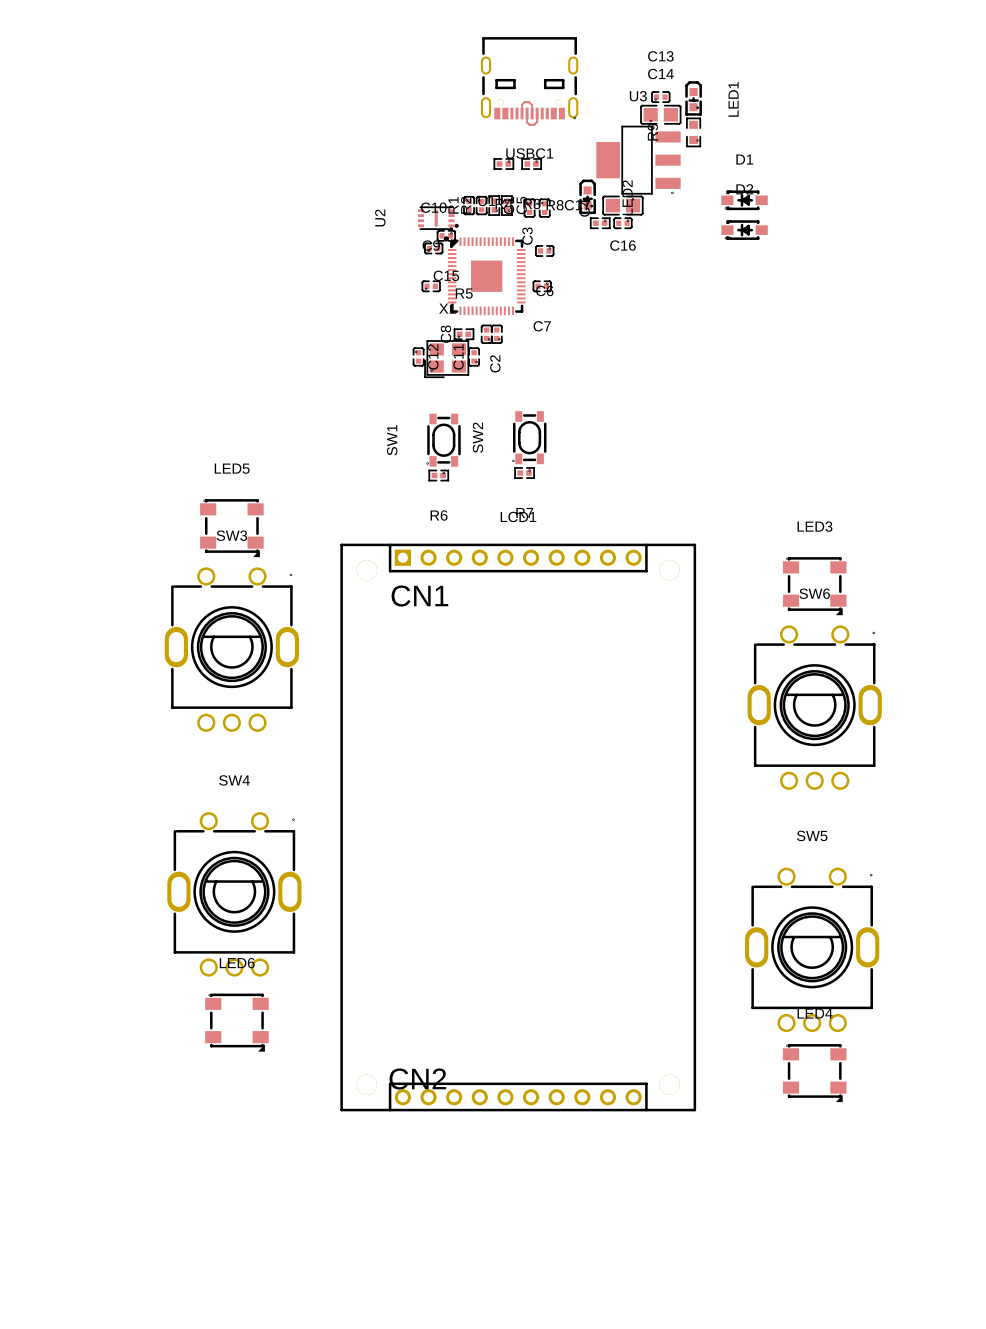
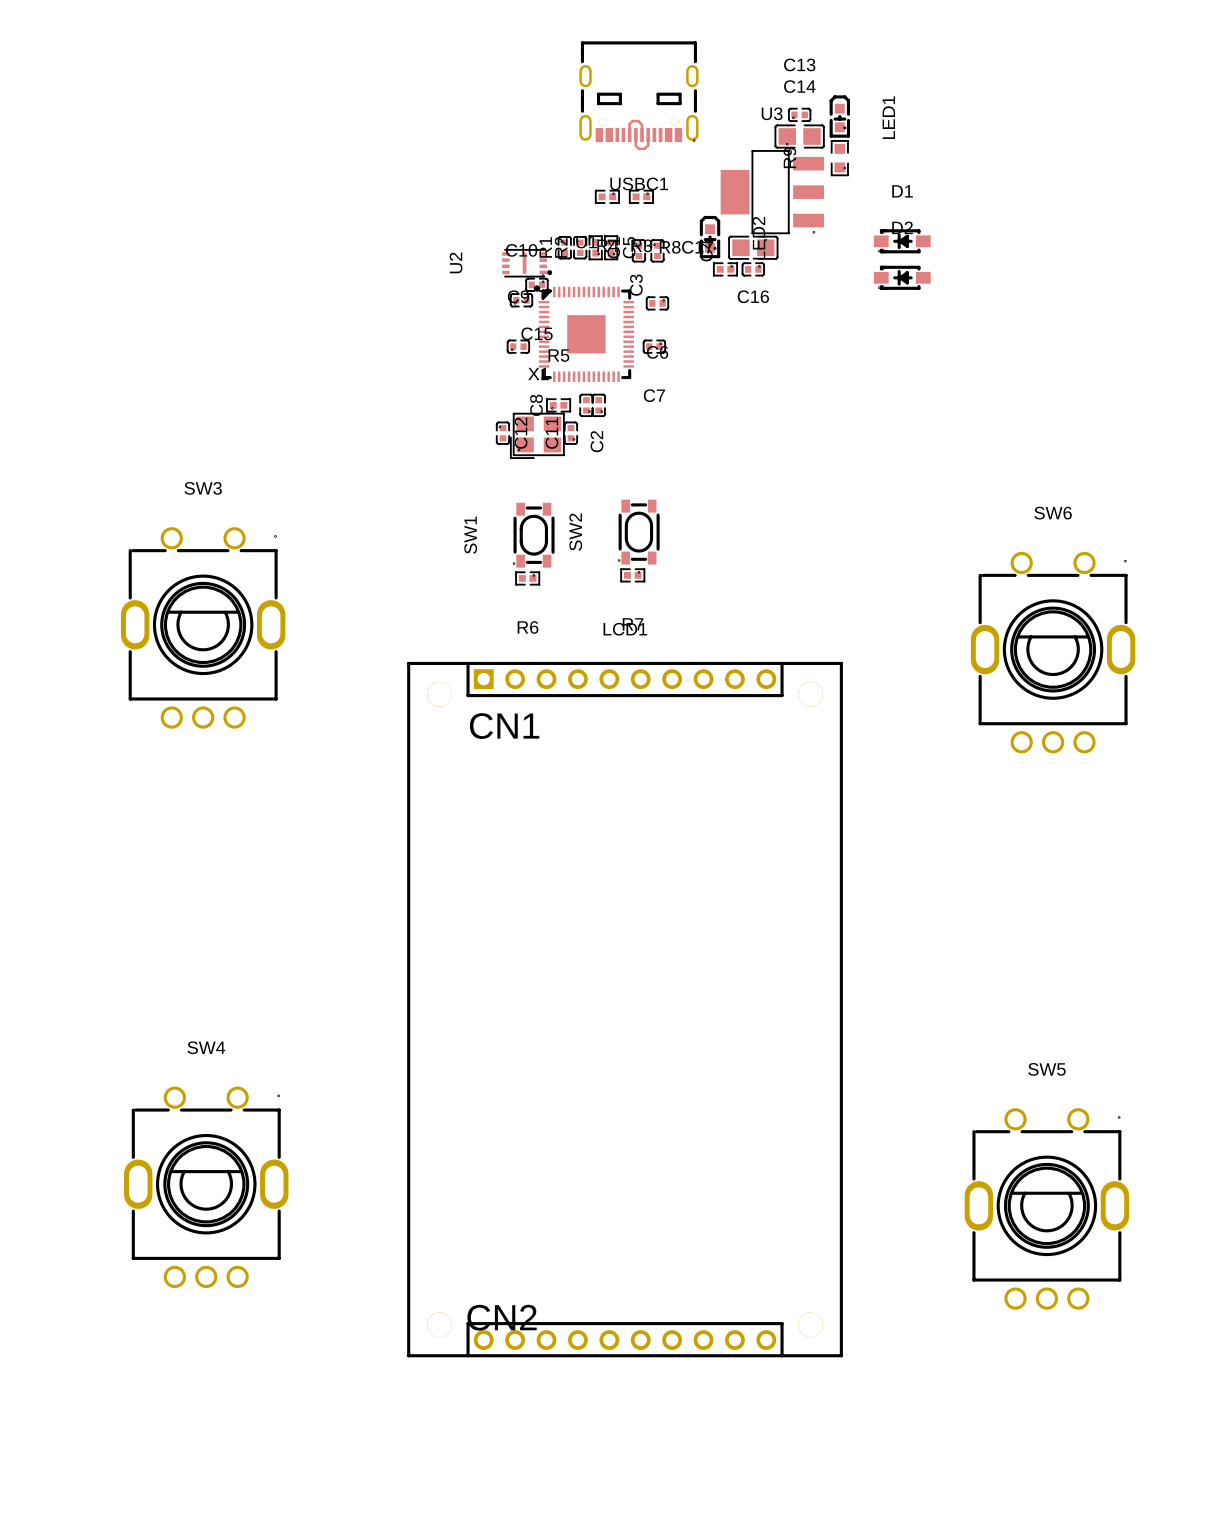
LED5: (231, 528) -> none
LED3: (814, 586) -> none
SW3 position: (231, 649) -> (203, 627)
SW6 position: (814, 707) -> (1053, 652)
SW4 position: (234, 894) -> (206, 1187)
SW5 position: (812, 949) -> (1046, 1208)
LED6: (236, 1022) -> none
LED4: (814, 1073) -> none

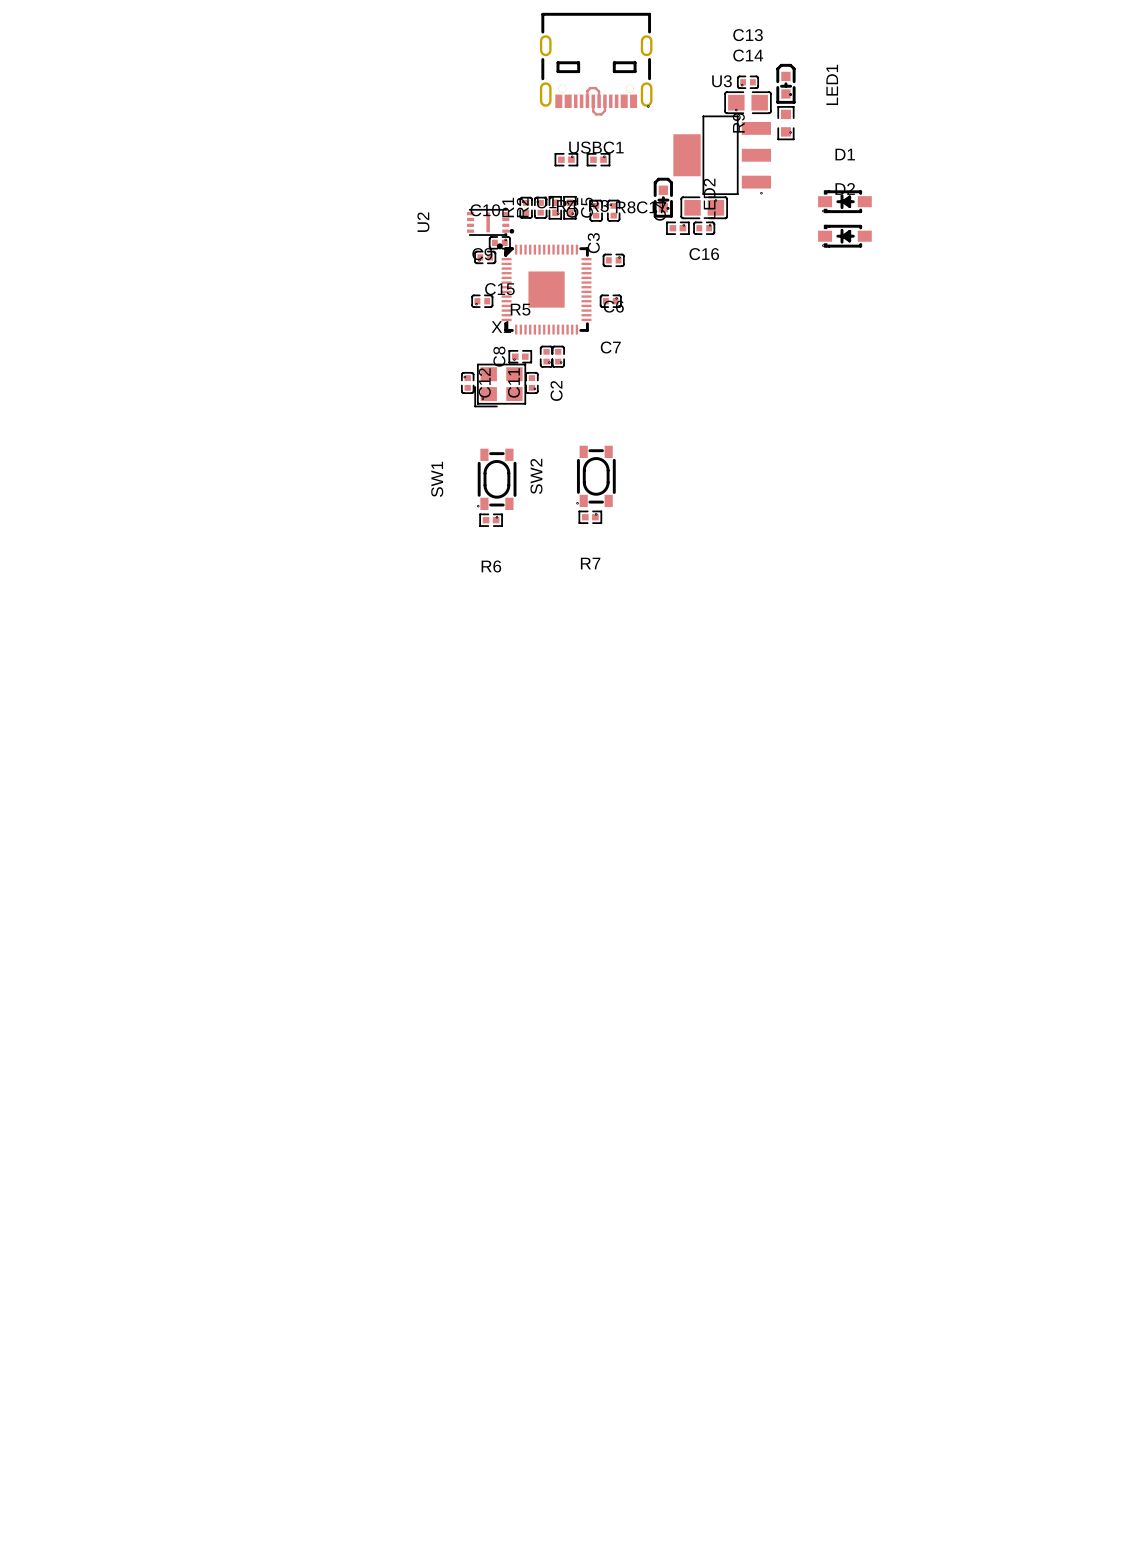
SW3: (203, 627) -> none
SW6: (1053, 652) -> none
LCD1: (625, 1009) -> none
SW4: (206, 1187) -> none
SW5: (1046, 1208) -> none

